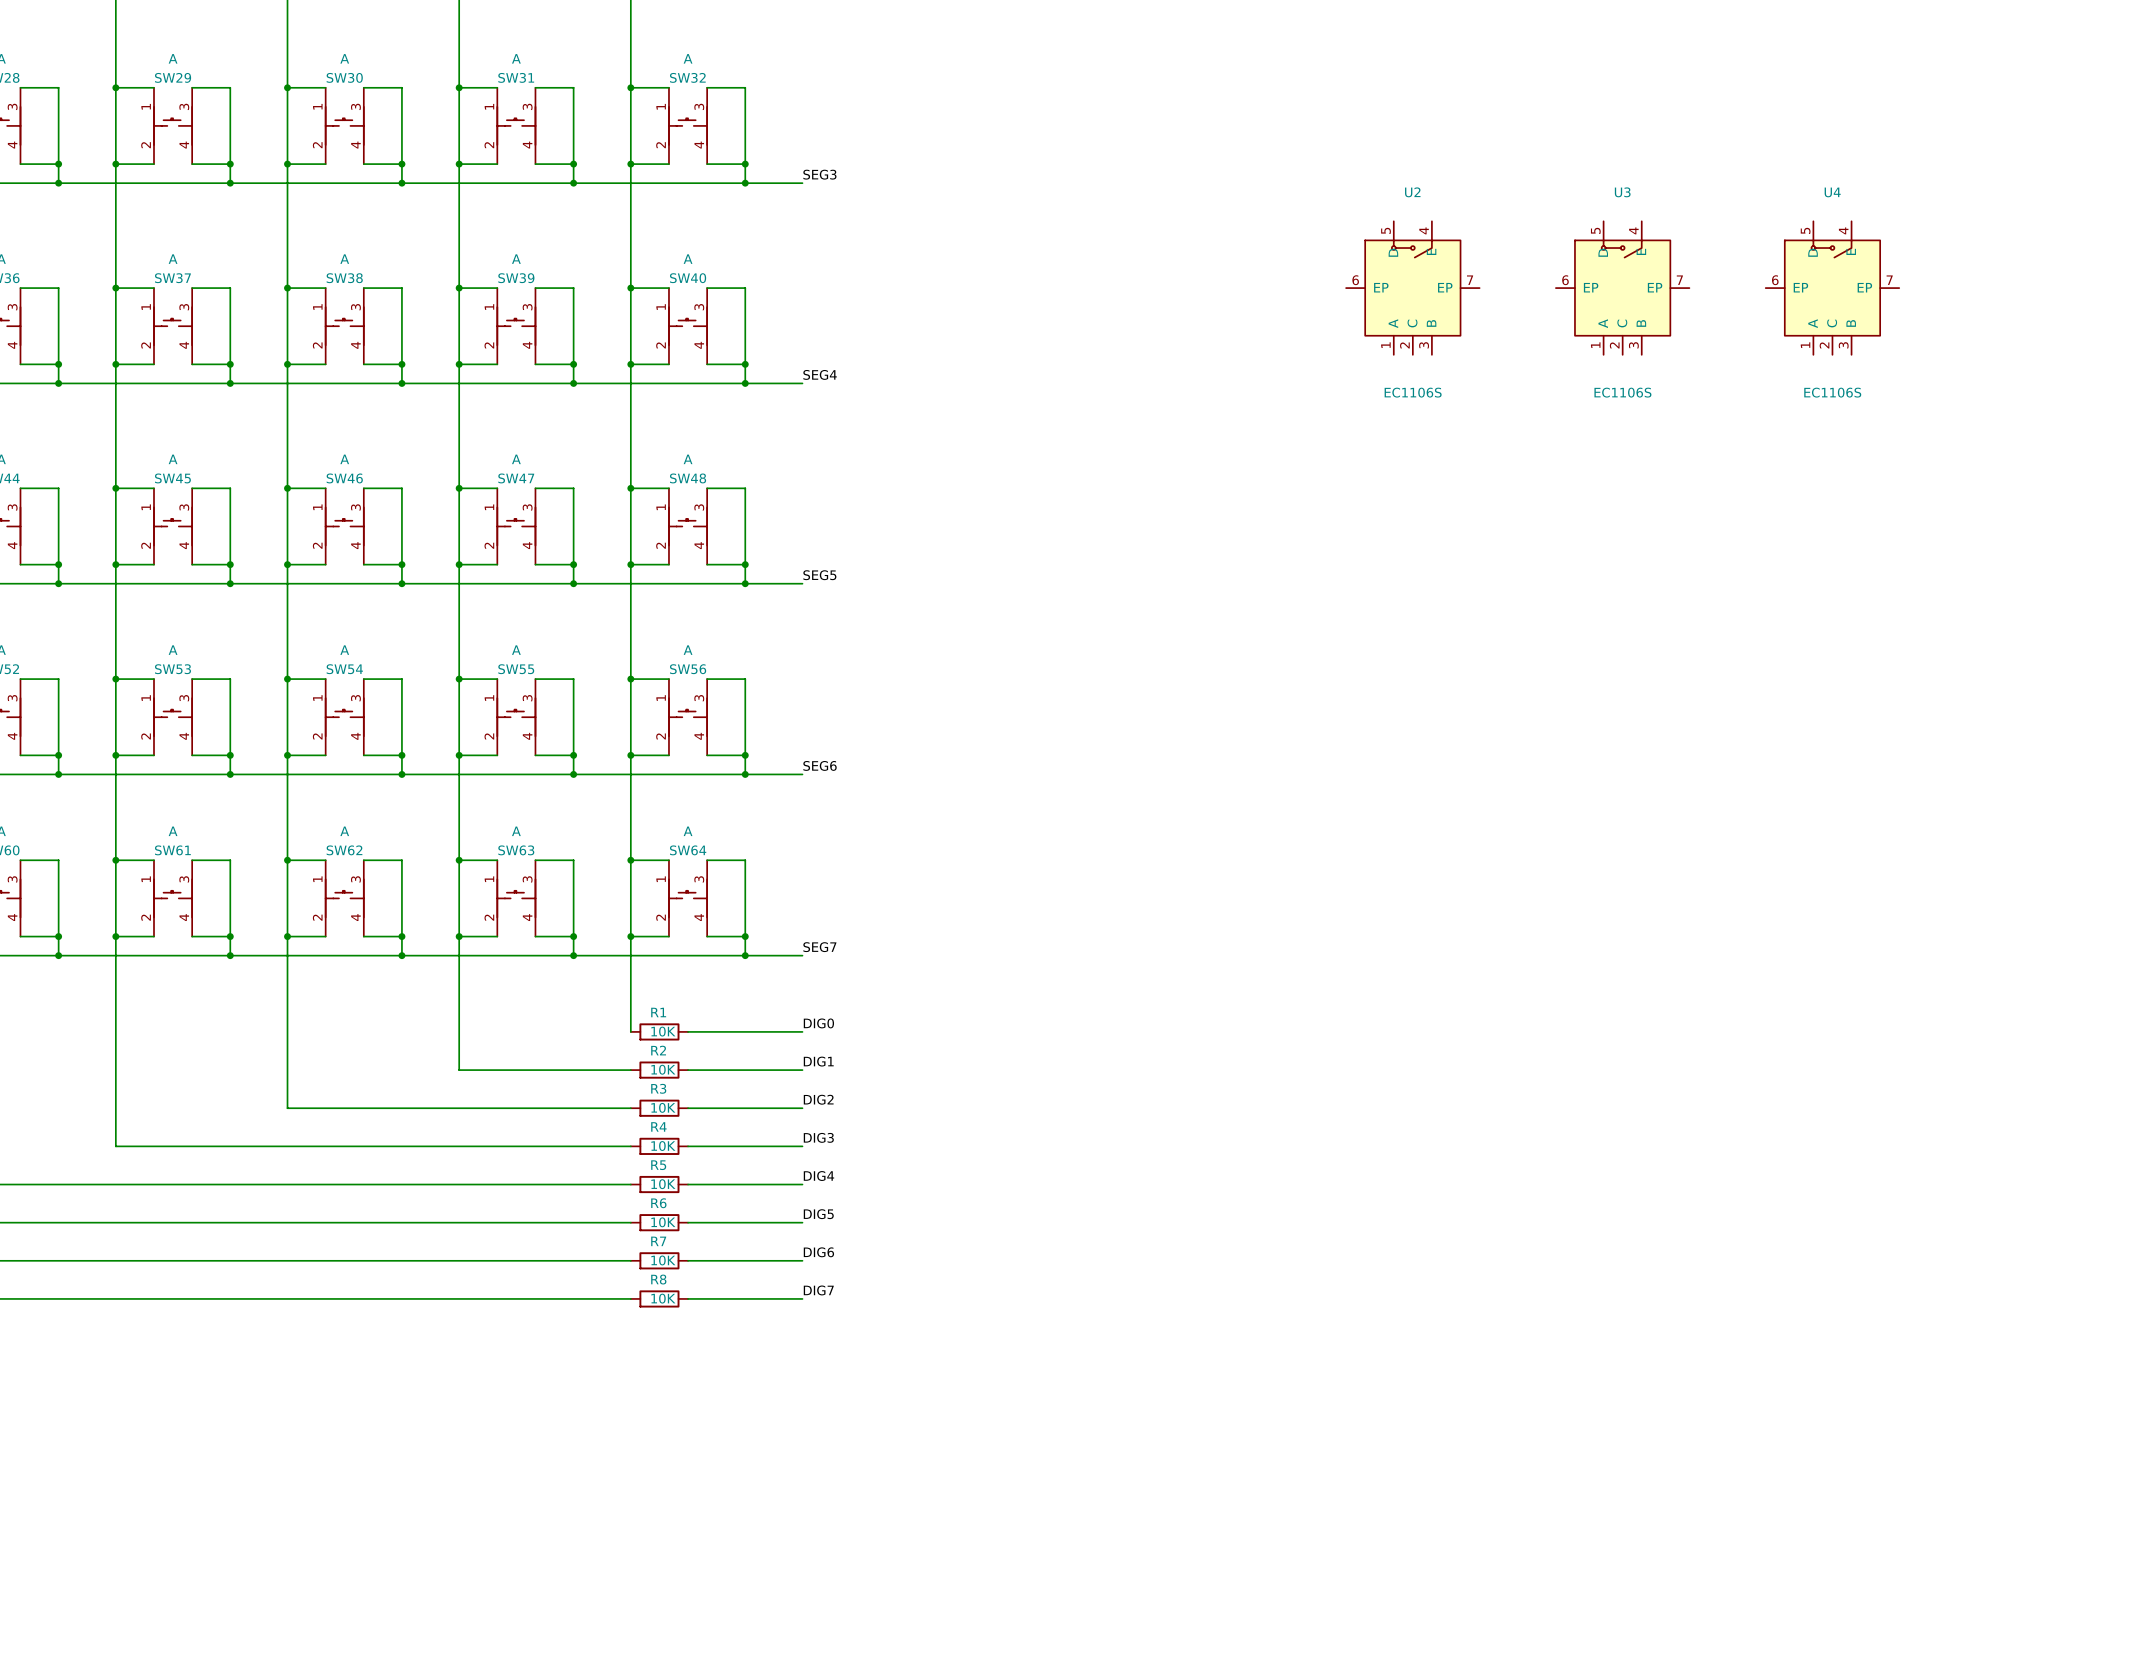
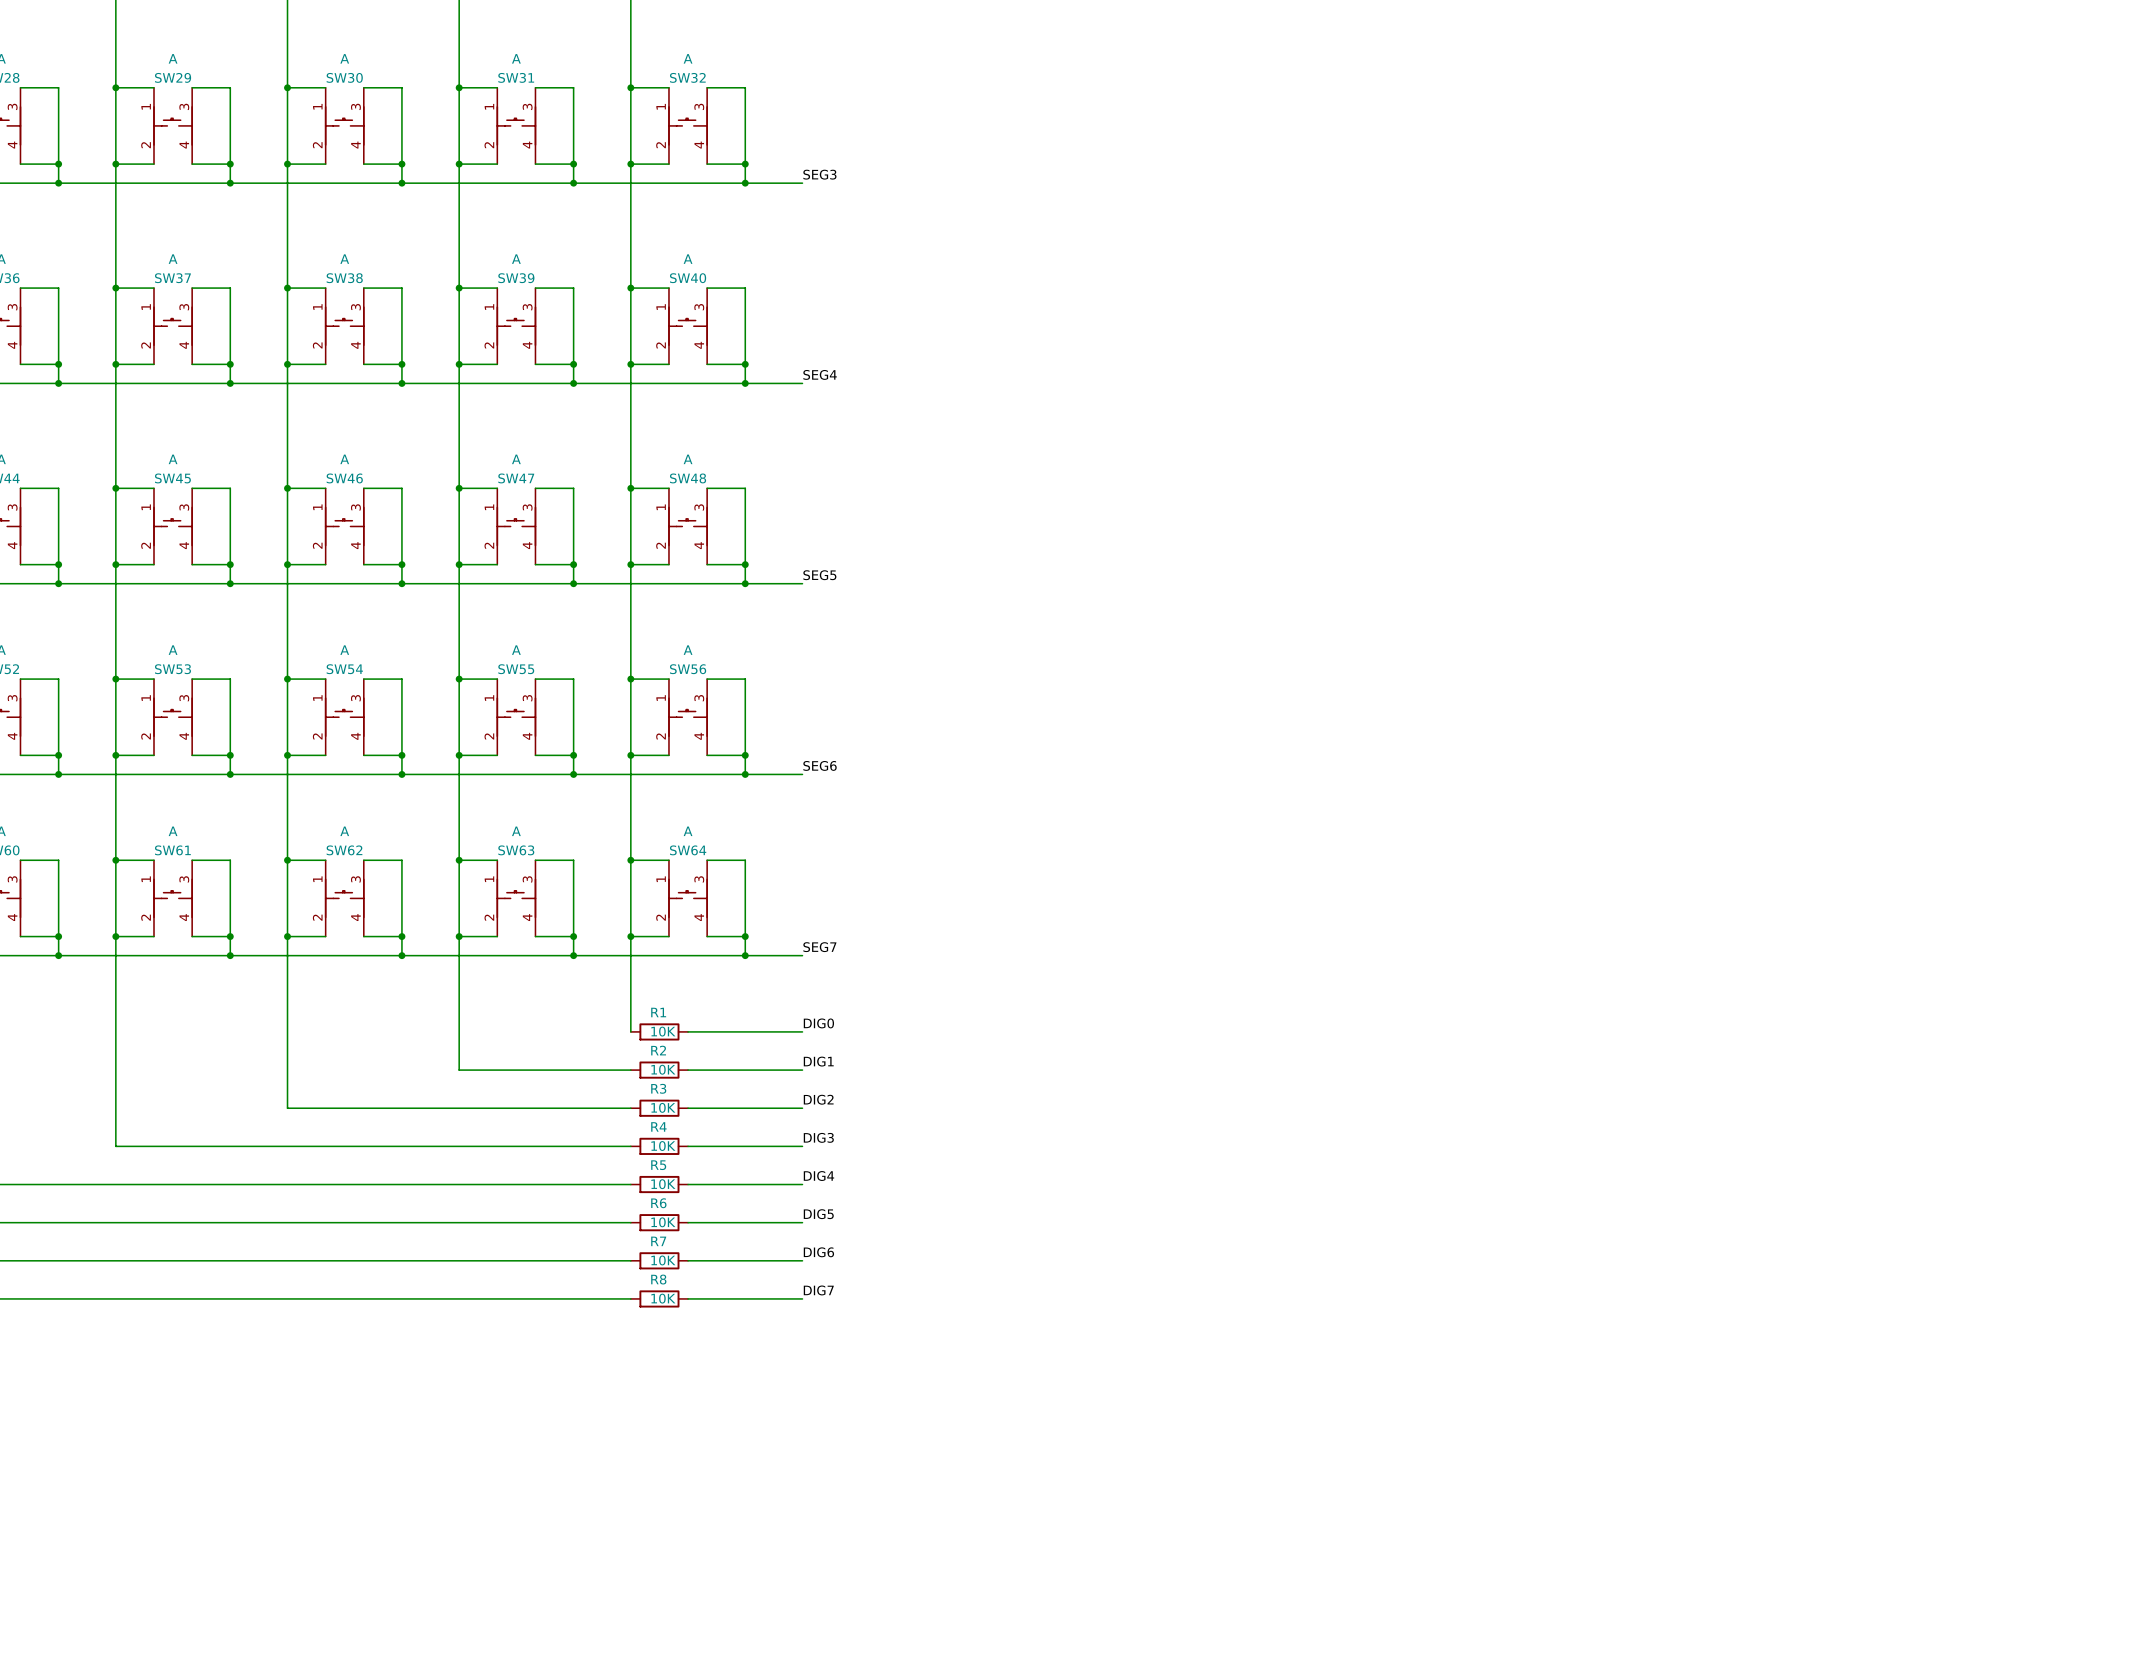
U2: EC1106S (1412, 288) -> none
U3: EC1106S (1622, 288) -> none
U4: EC1106S (1832, 288) -> none

